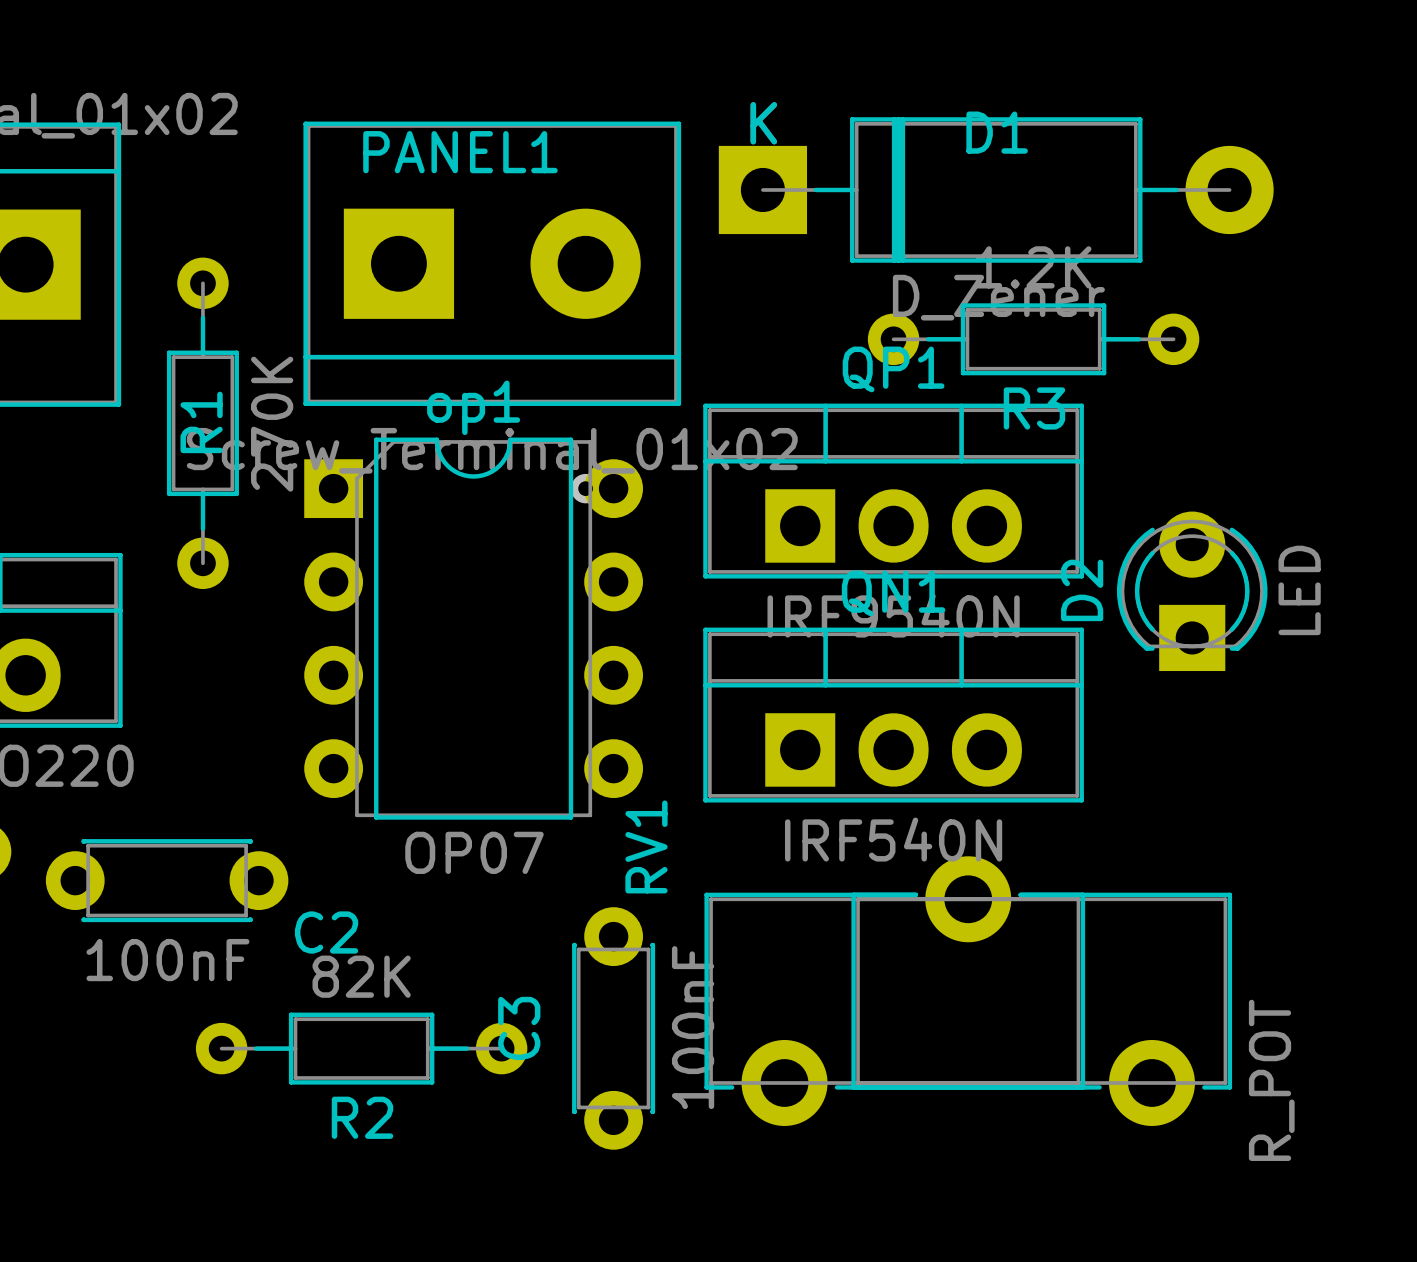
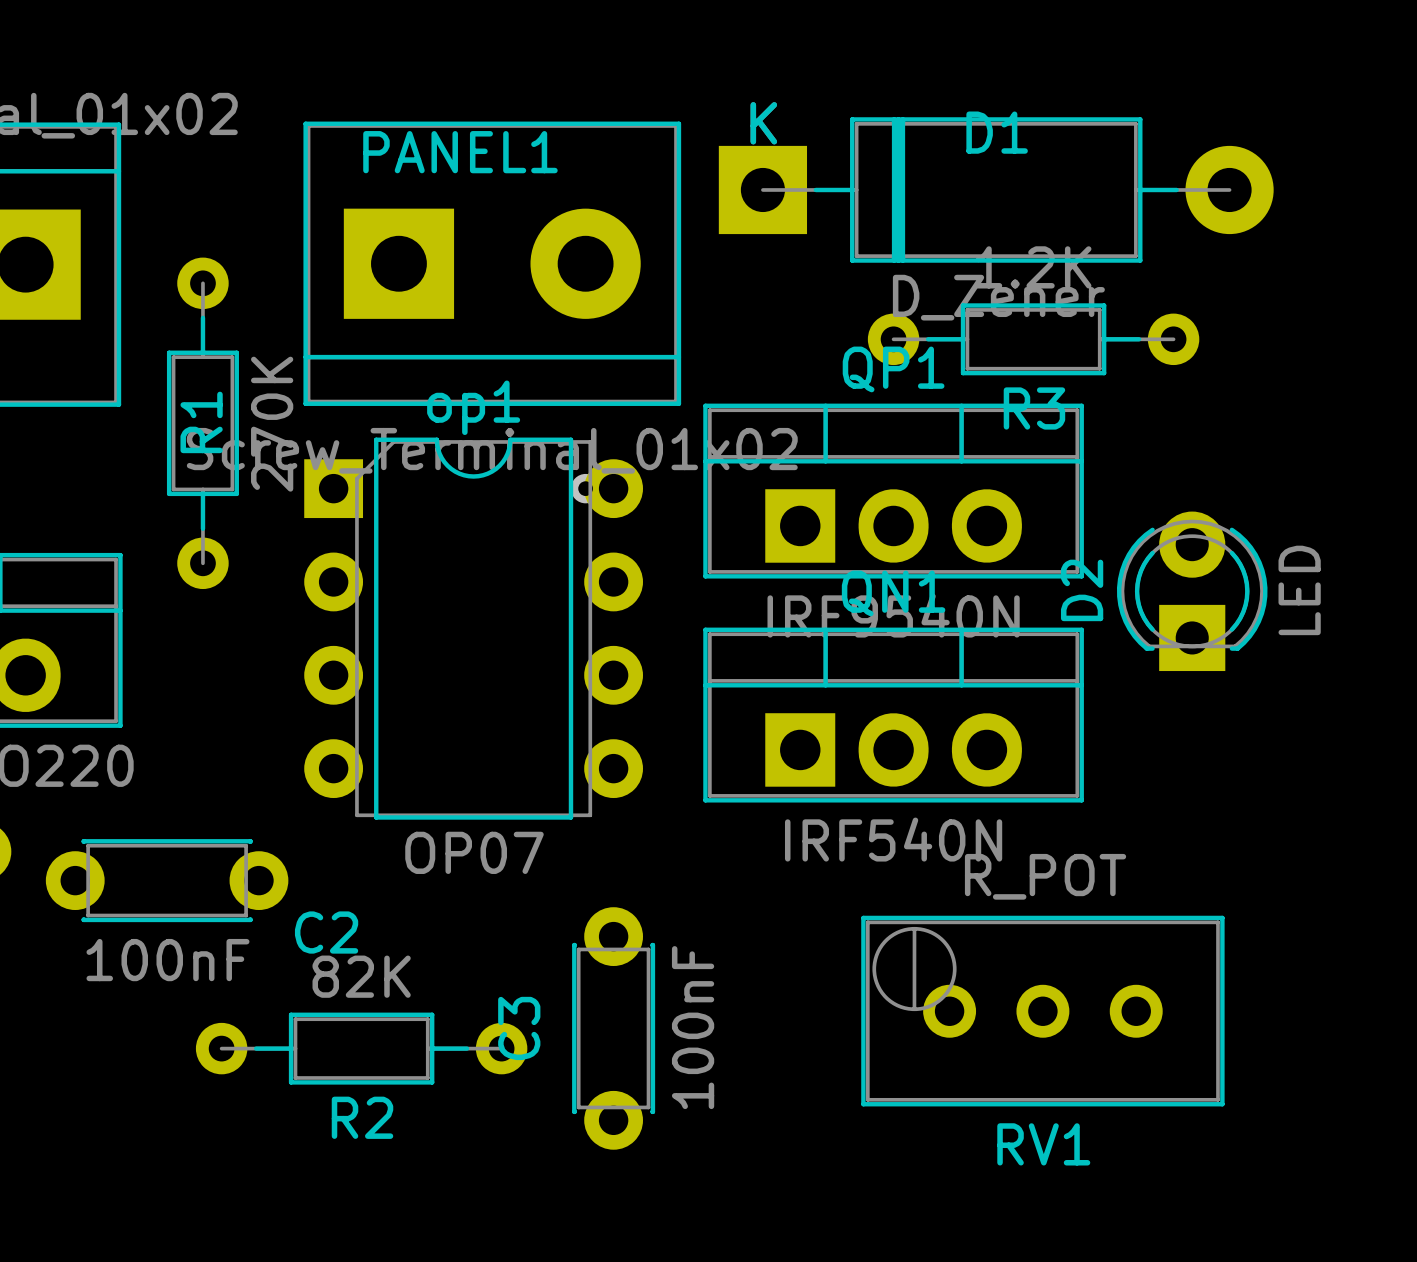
RV1 name position: RV1 (646, 846) -> RV1 (1043, 1144)
RV1 footprint: [704, 856, 1233, 1126] -> [861, 915, 1225, 1107]
RV1 value position: R_POT (1271, 1080) -> R_POT (1045, 876)

